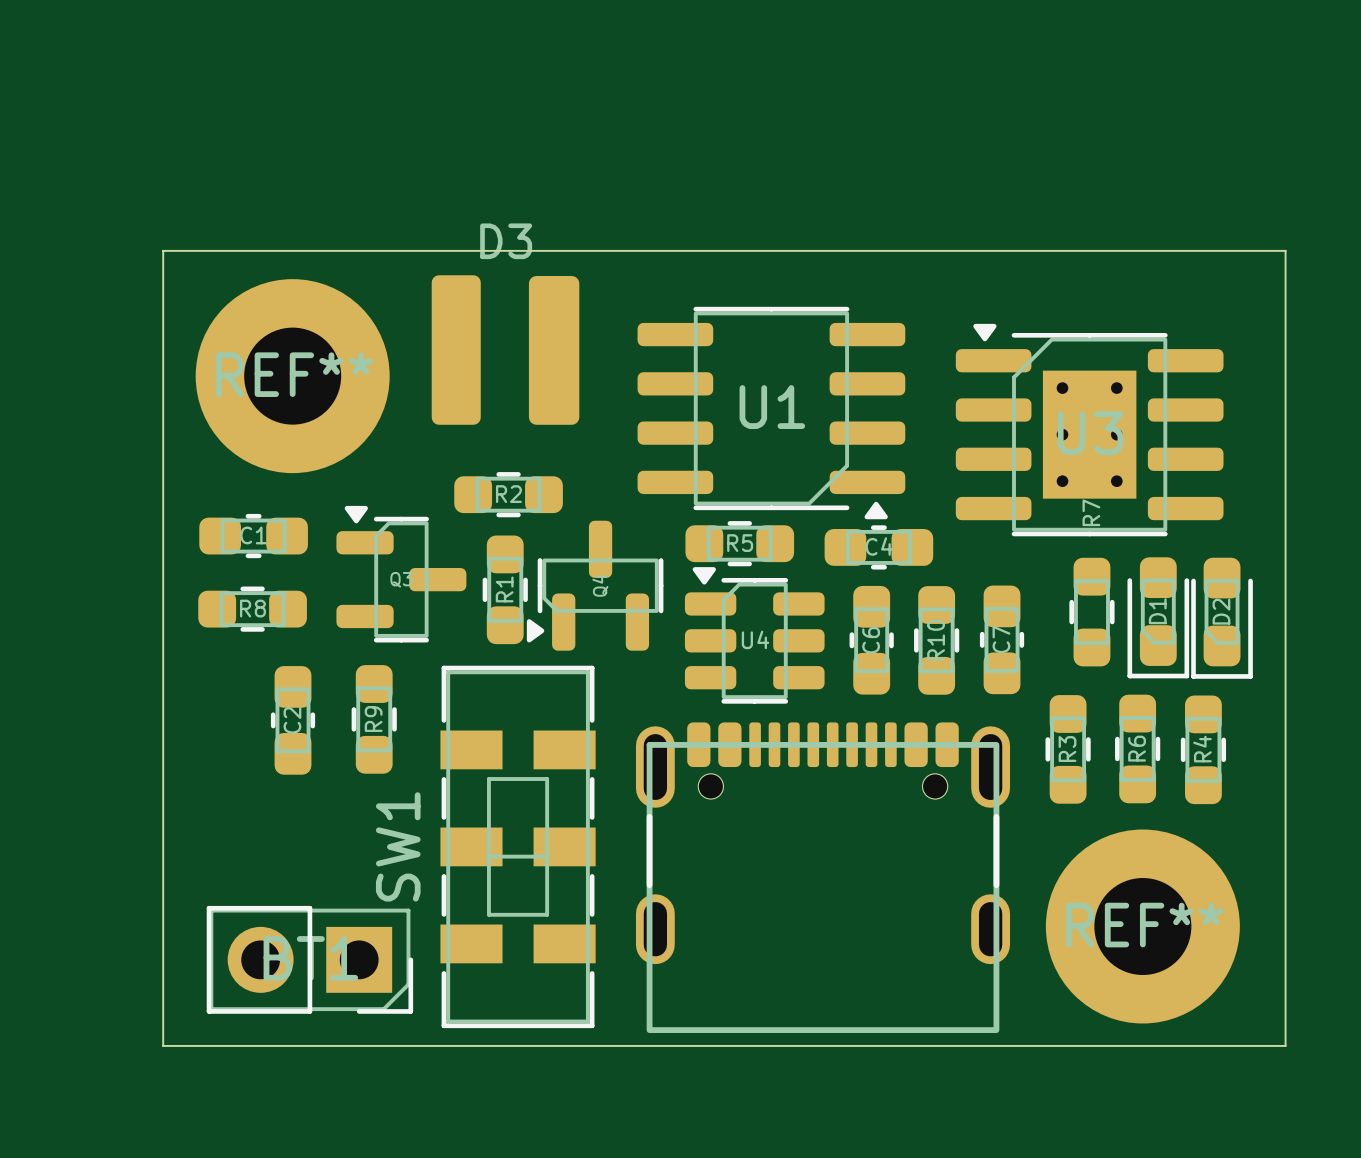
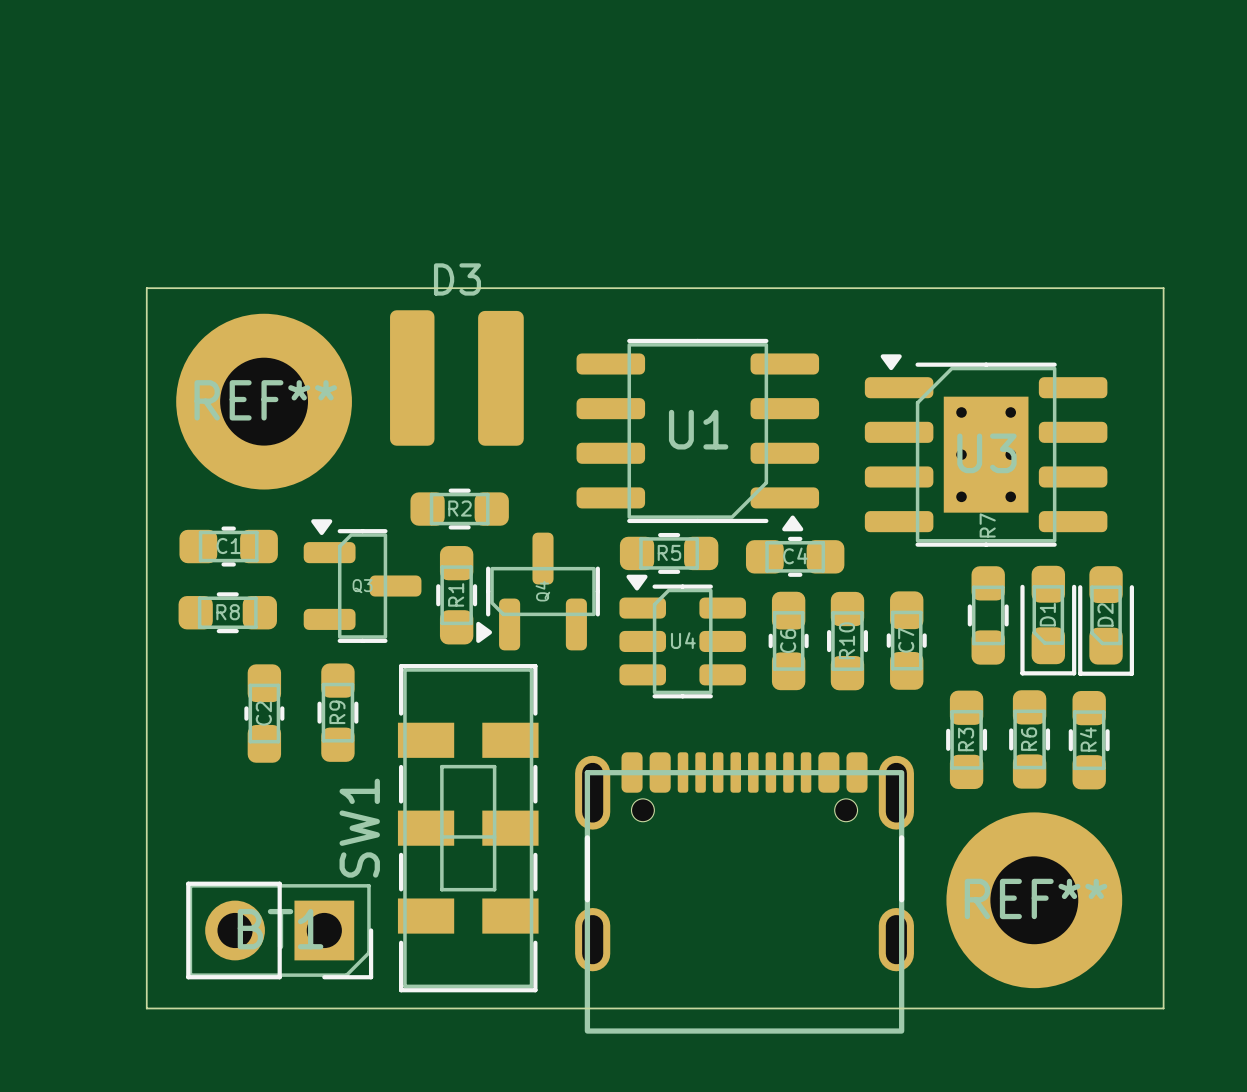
part position: (822, 877) -> (744, 892)

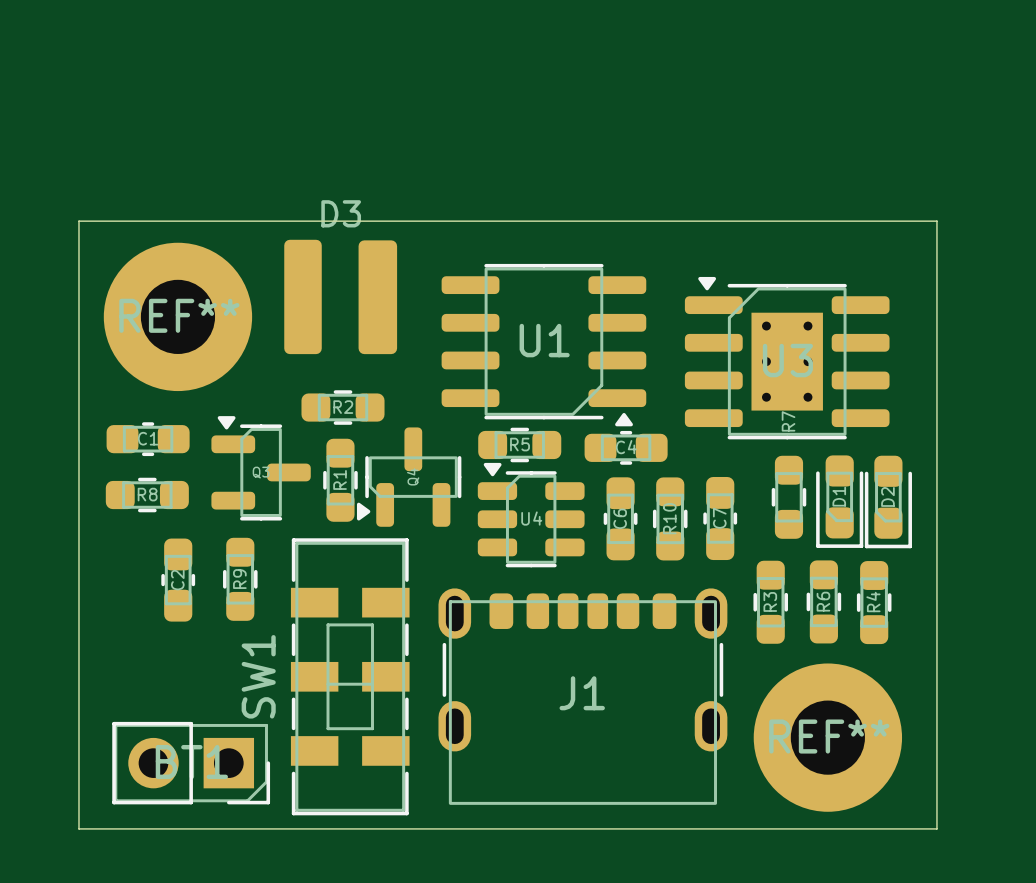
J1: none -> (582, 696)
part: (744, 892) -> none

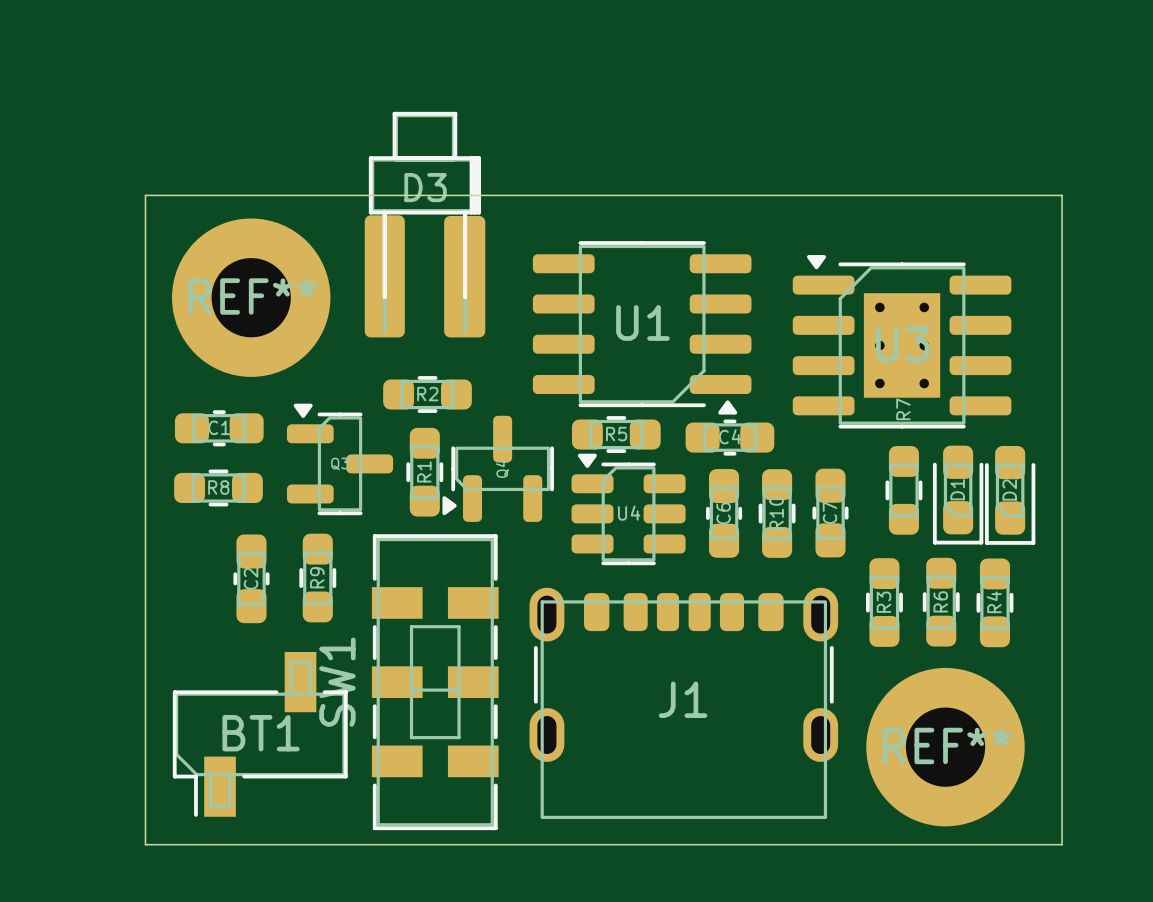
D3 footprint: [284, 239, 398, 355] -> [364, 111, 486, 338]
BT1 footprint: [112, 721, 271, 805] -> [172, 652, 348, 817]

